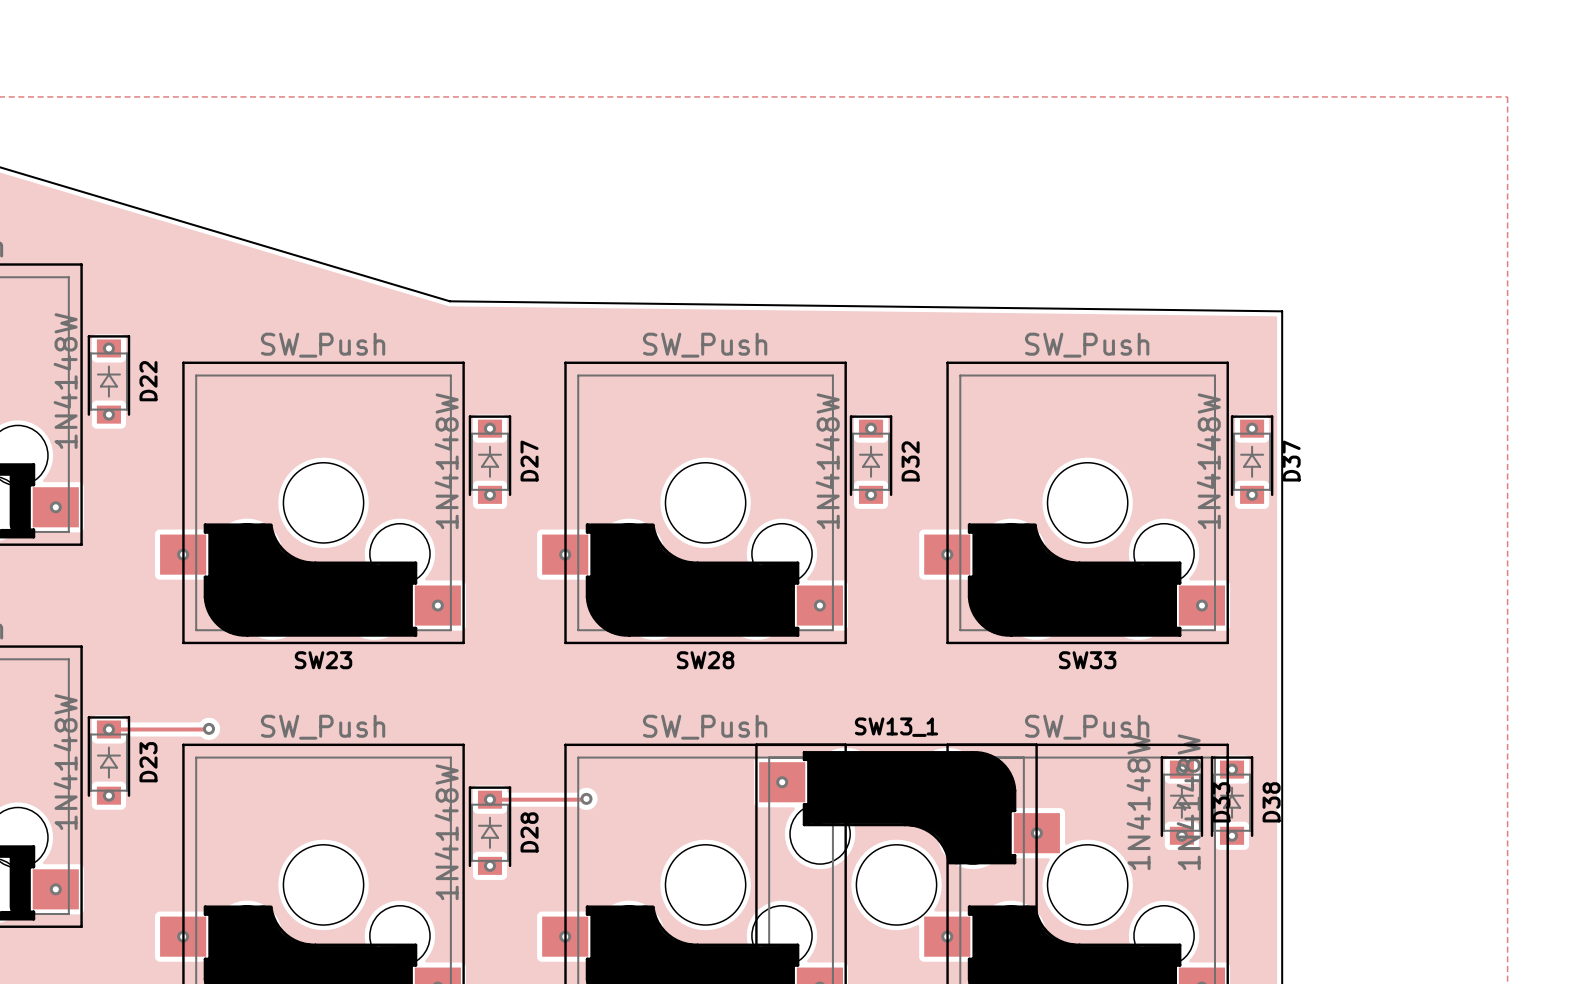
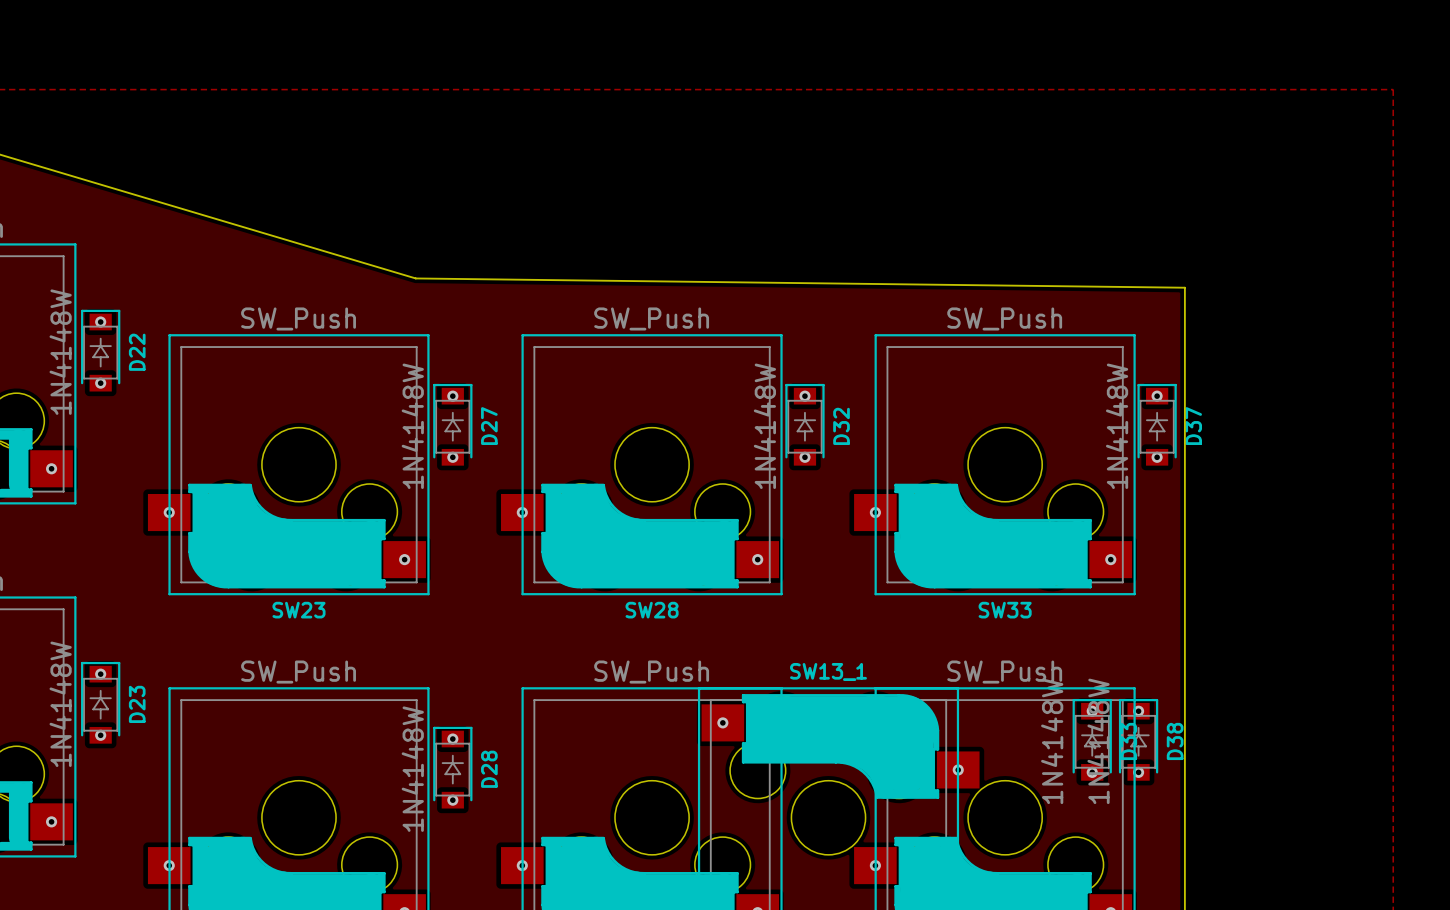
track: (209, 728) (108, 729) -> none
via: (209, 728) -> none
track: (586, 798) (489, 799) -> none
via: (586, 798) -> none

